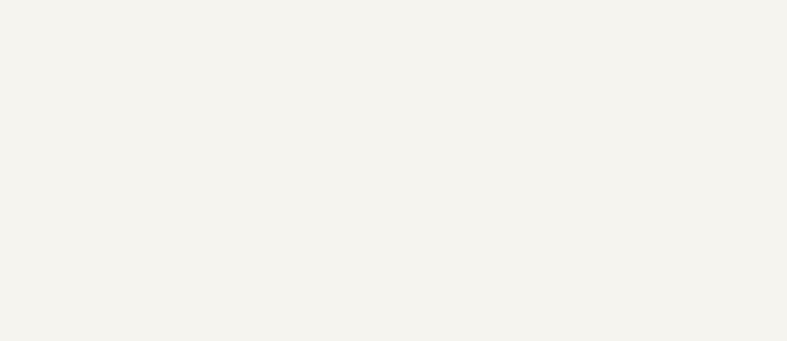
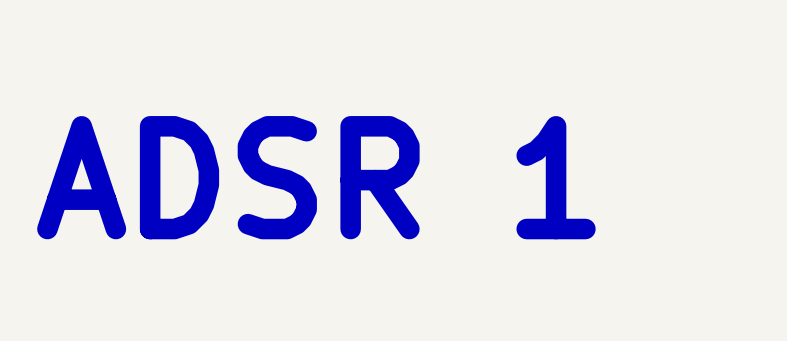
text: none -> ADSR 1 (316, 177)

